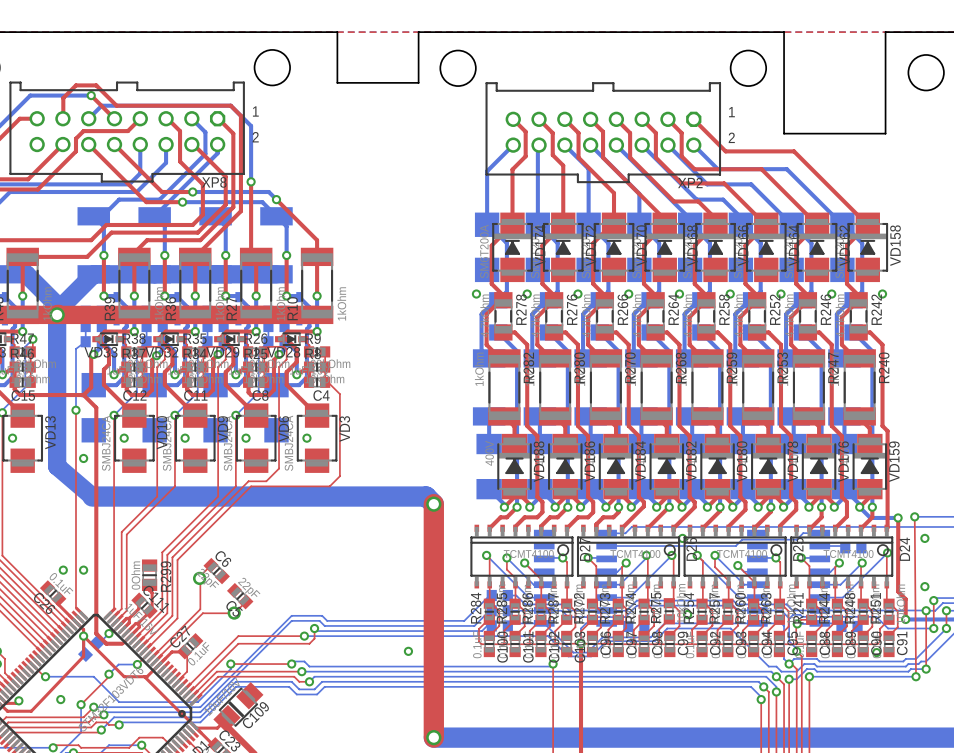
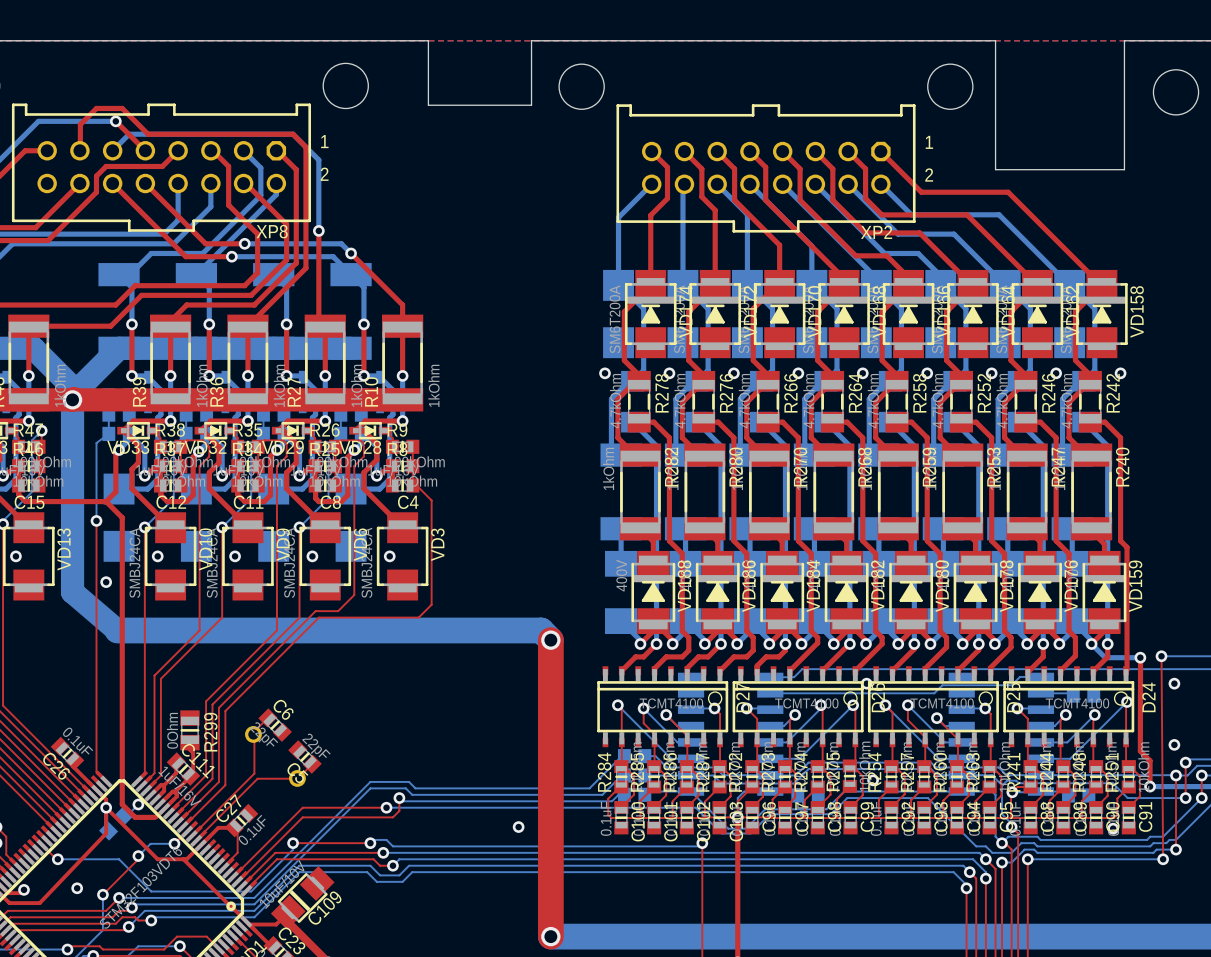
via: (63, 570) -> none
via: (83, 570) -> none

